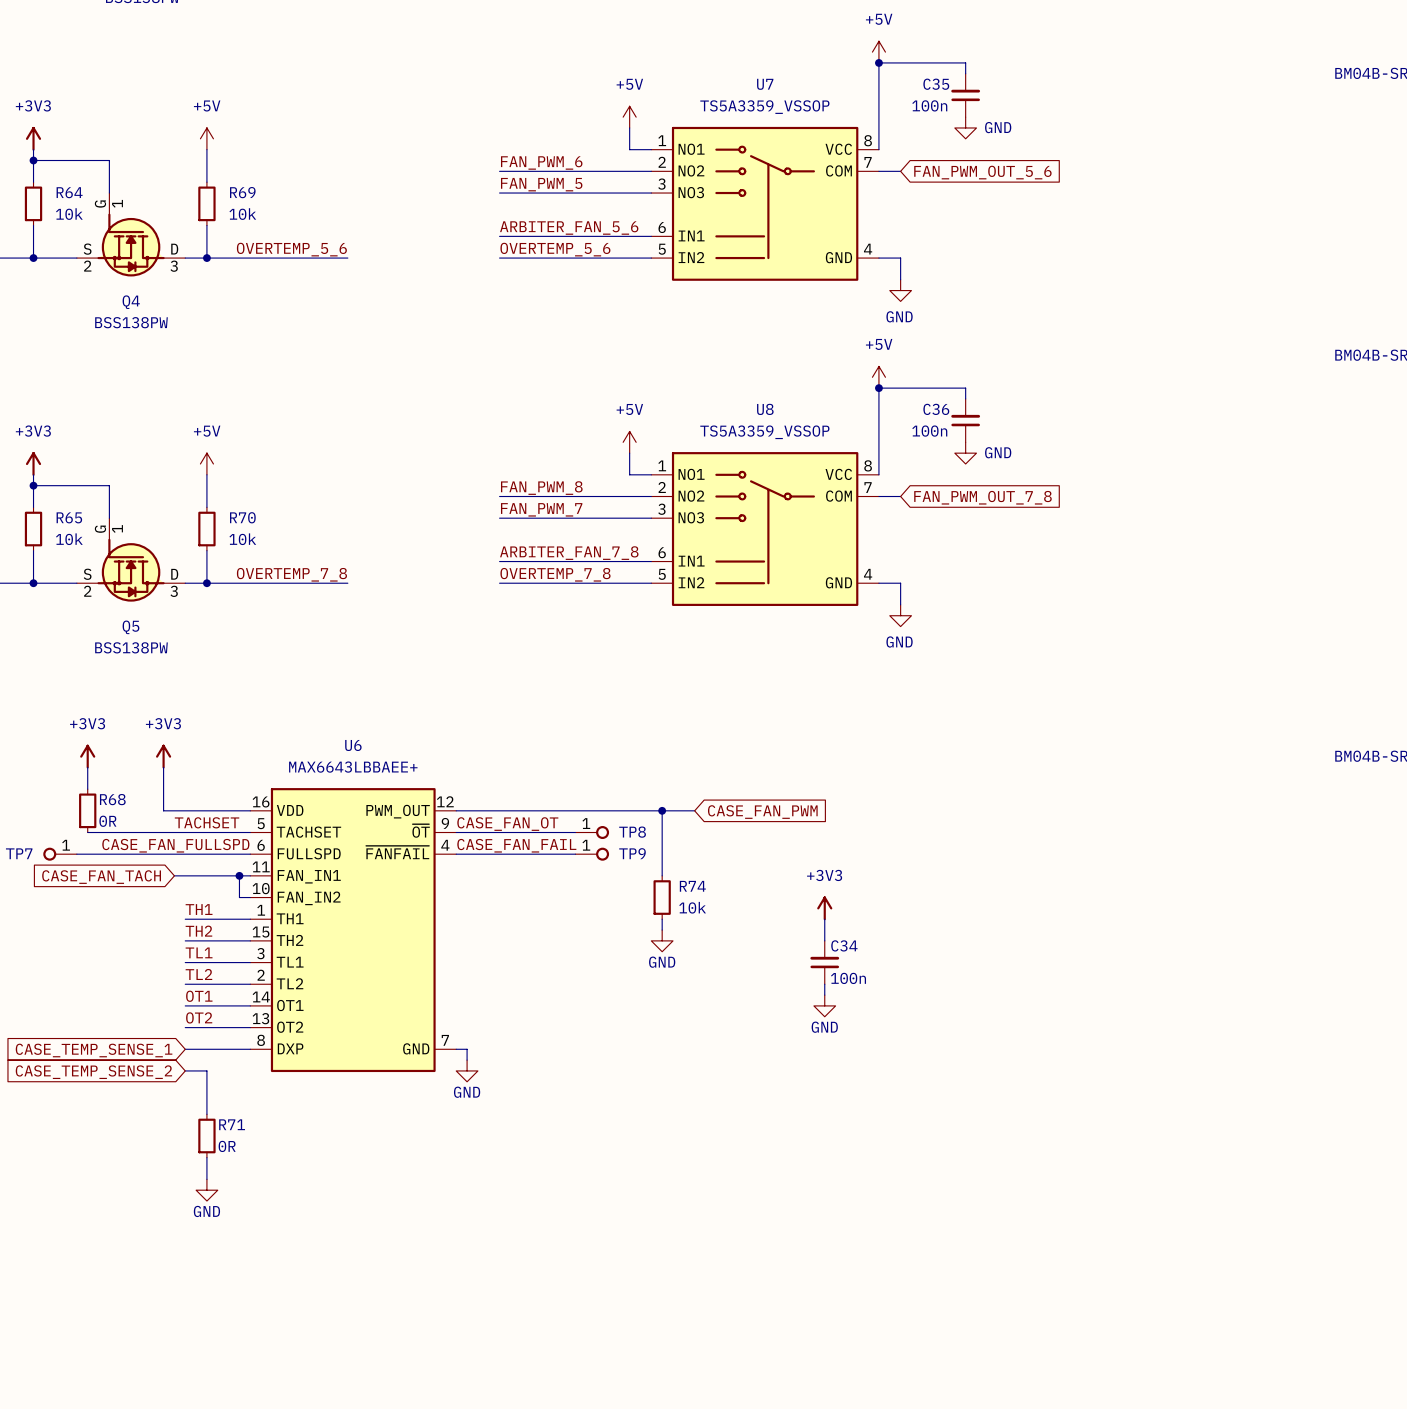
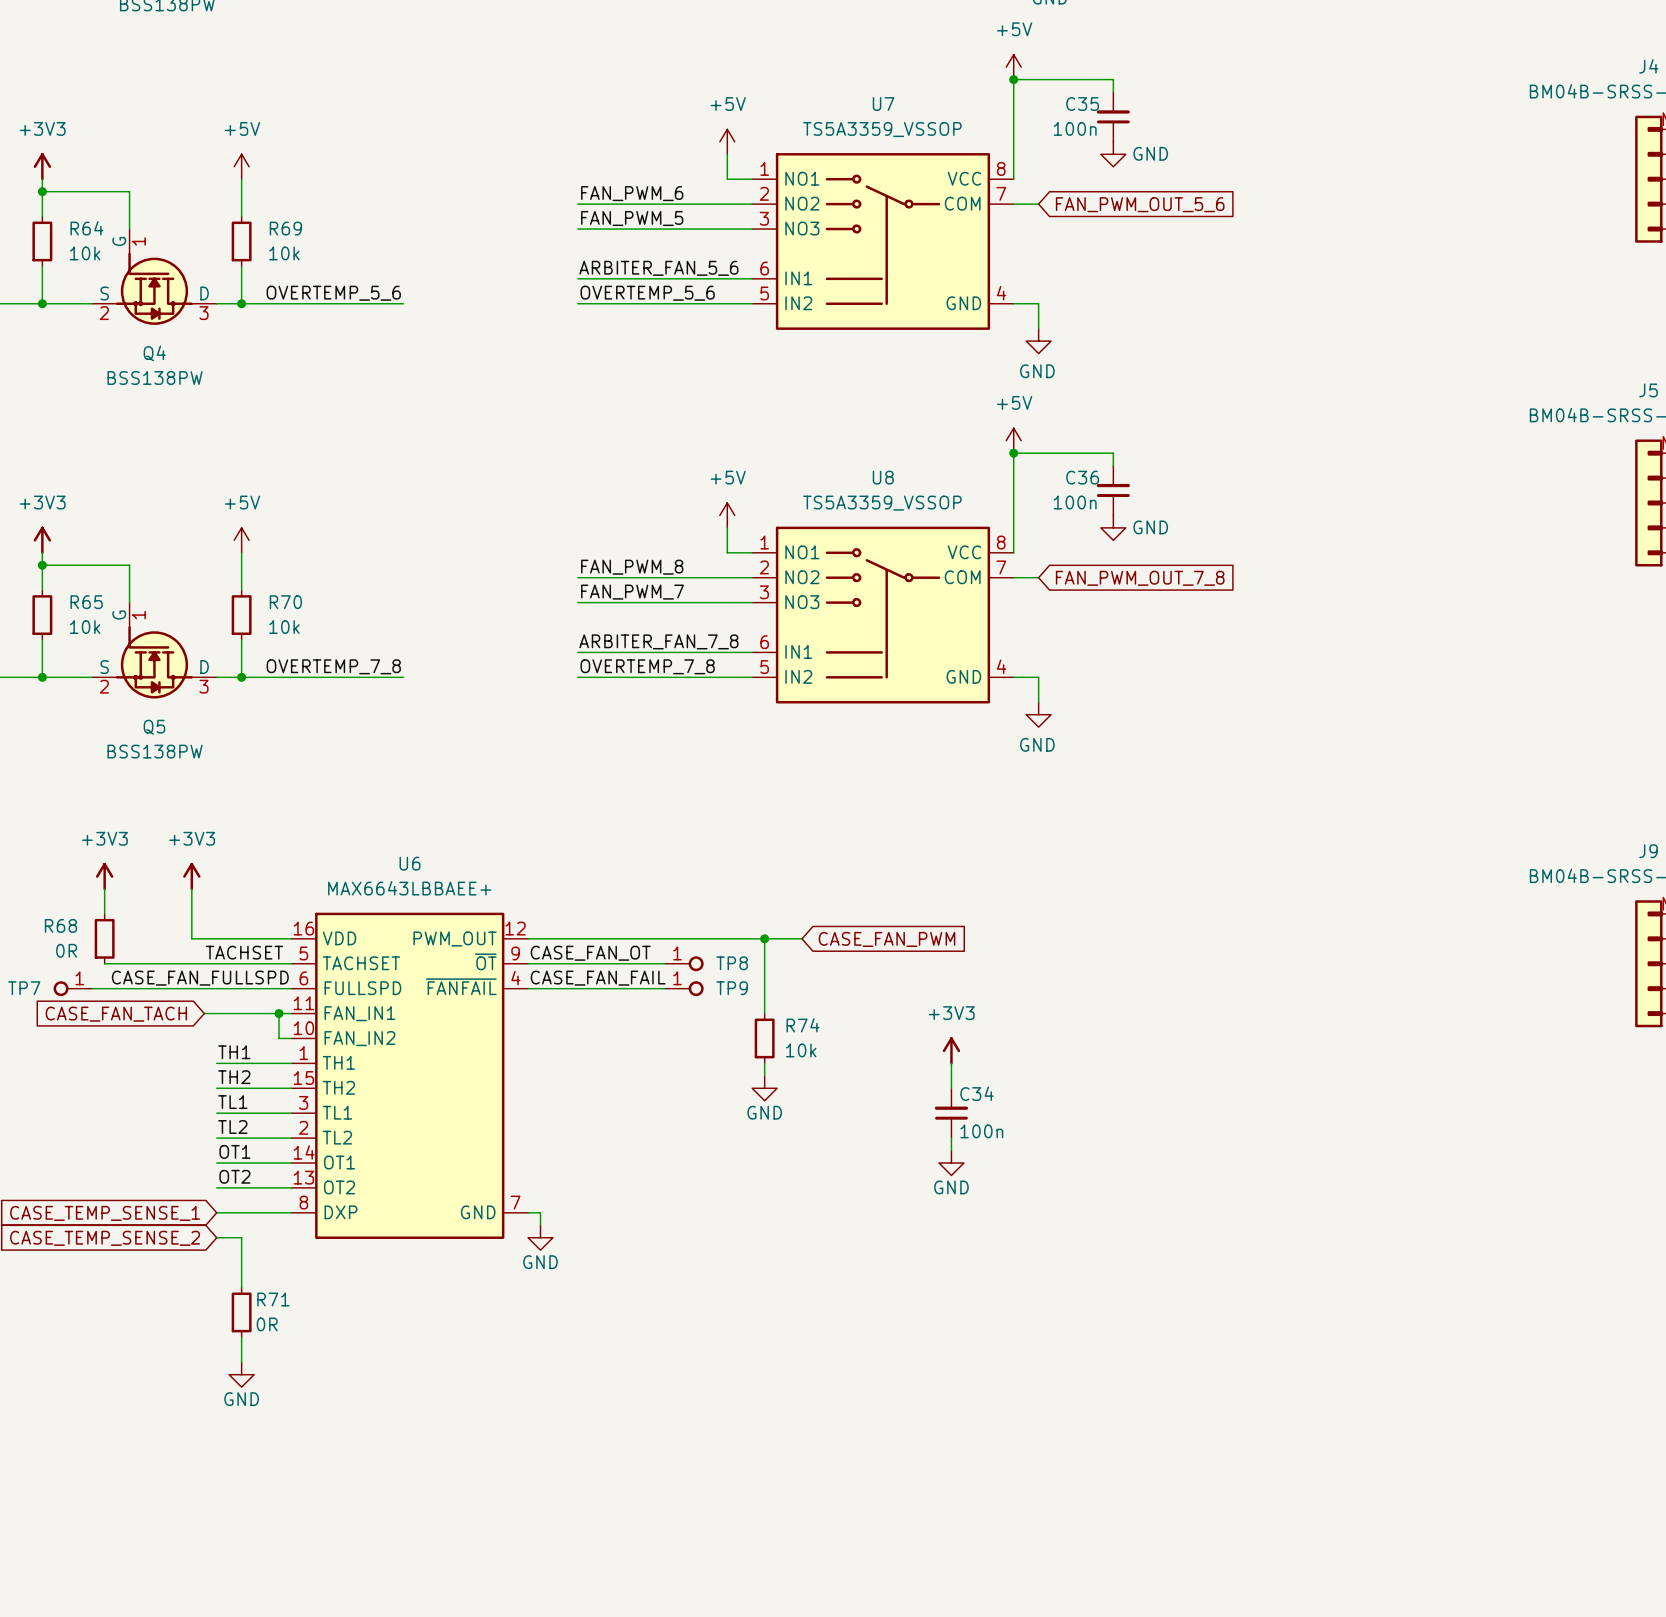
R68 name position: R68 (112, 799) -> R68 (60, 925)
R68 text position: 0R (107, 821) -> 0R (66, 950)

